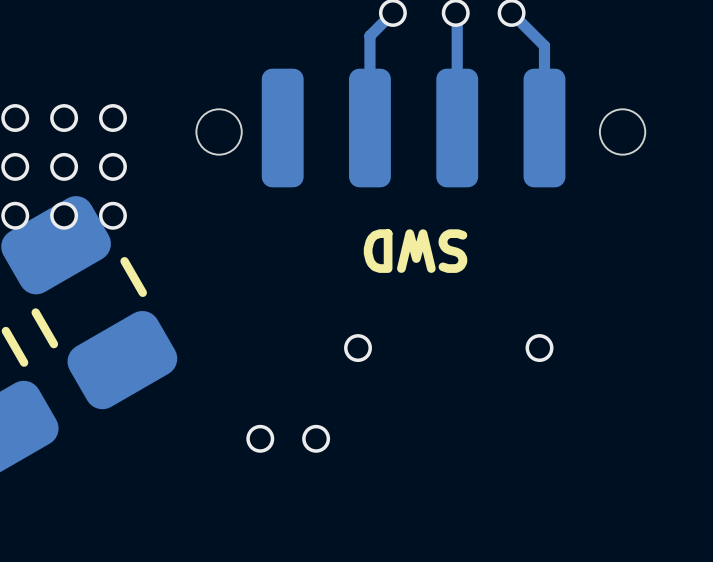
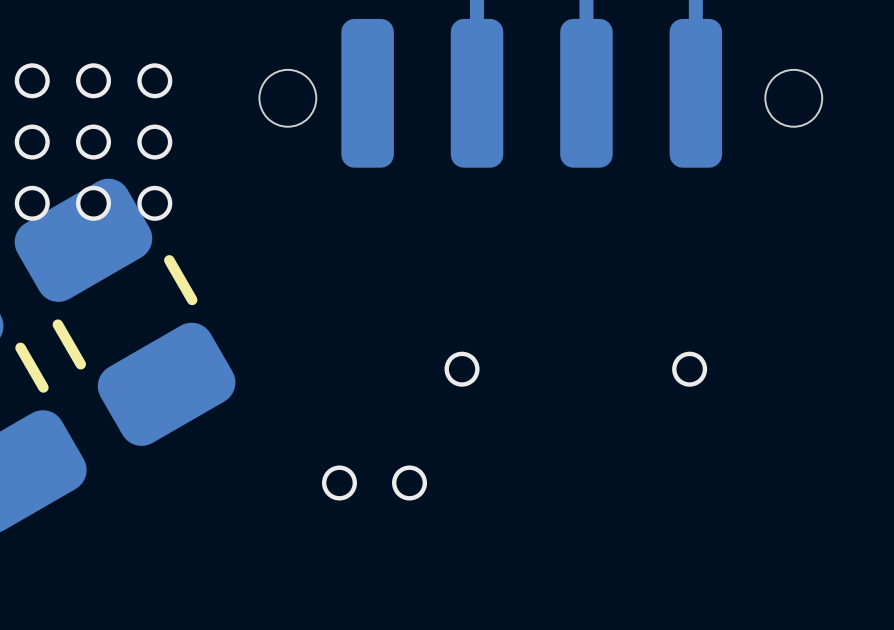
text: SWD (415, 251) -> none

